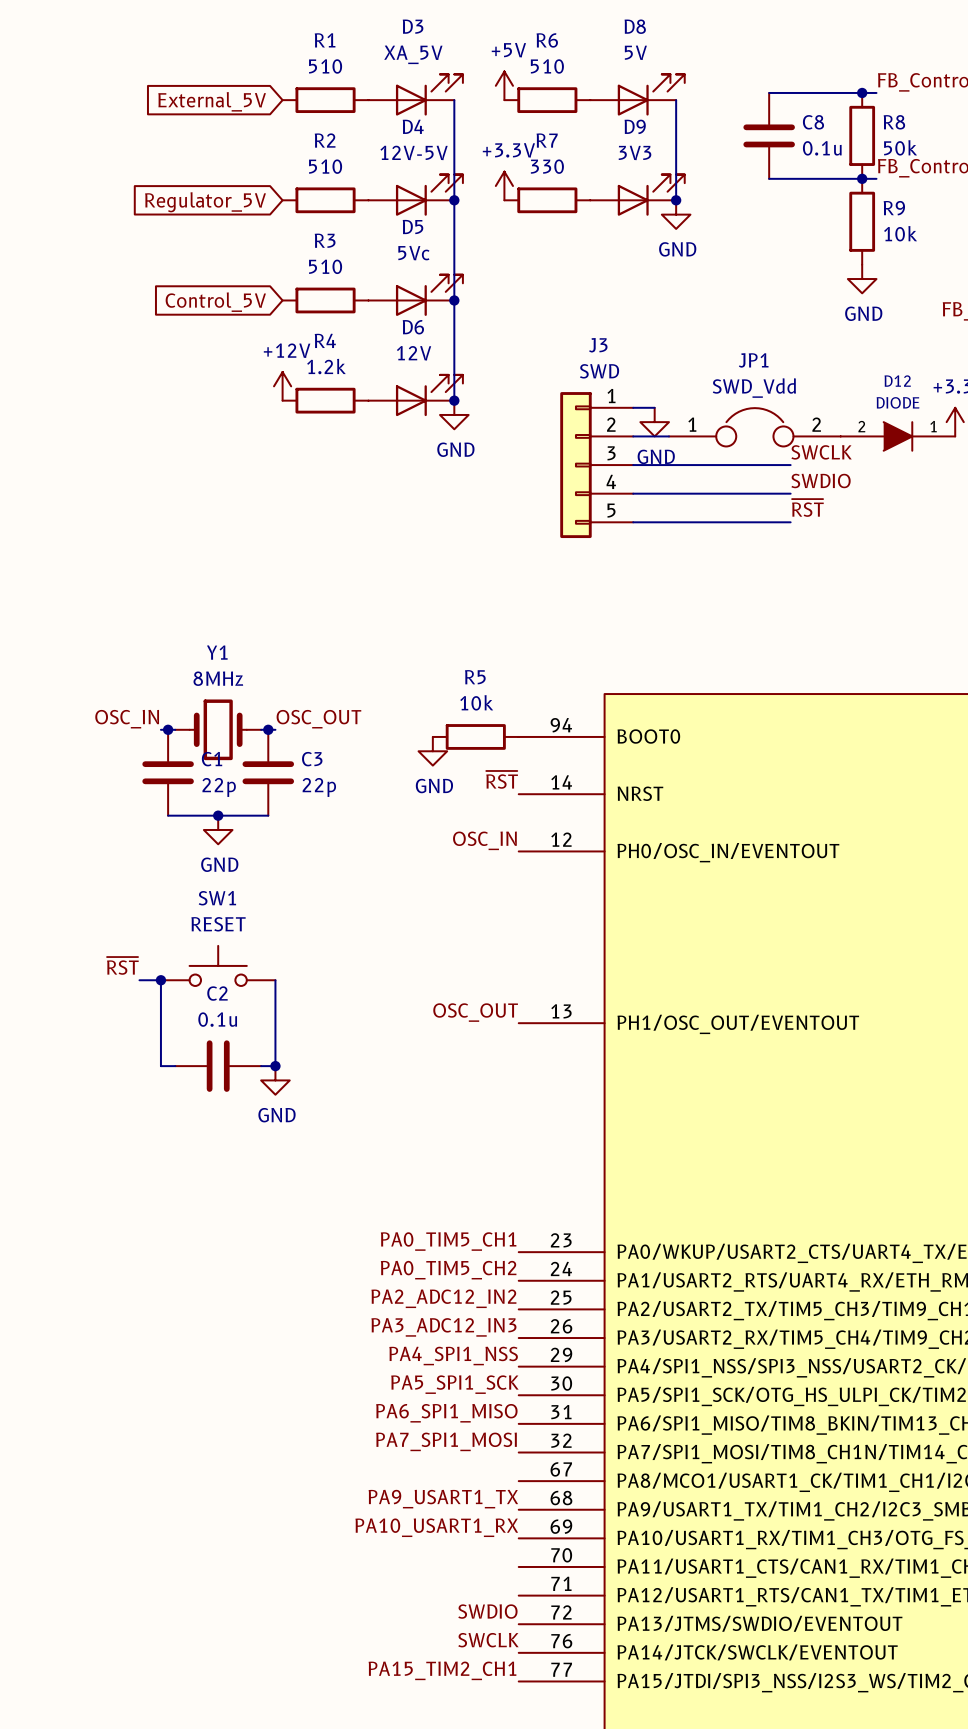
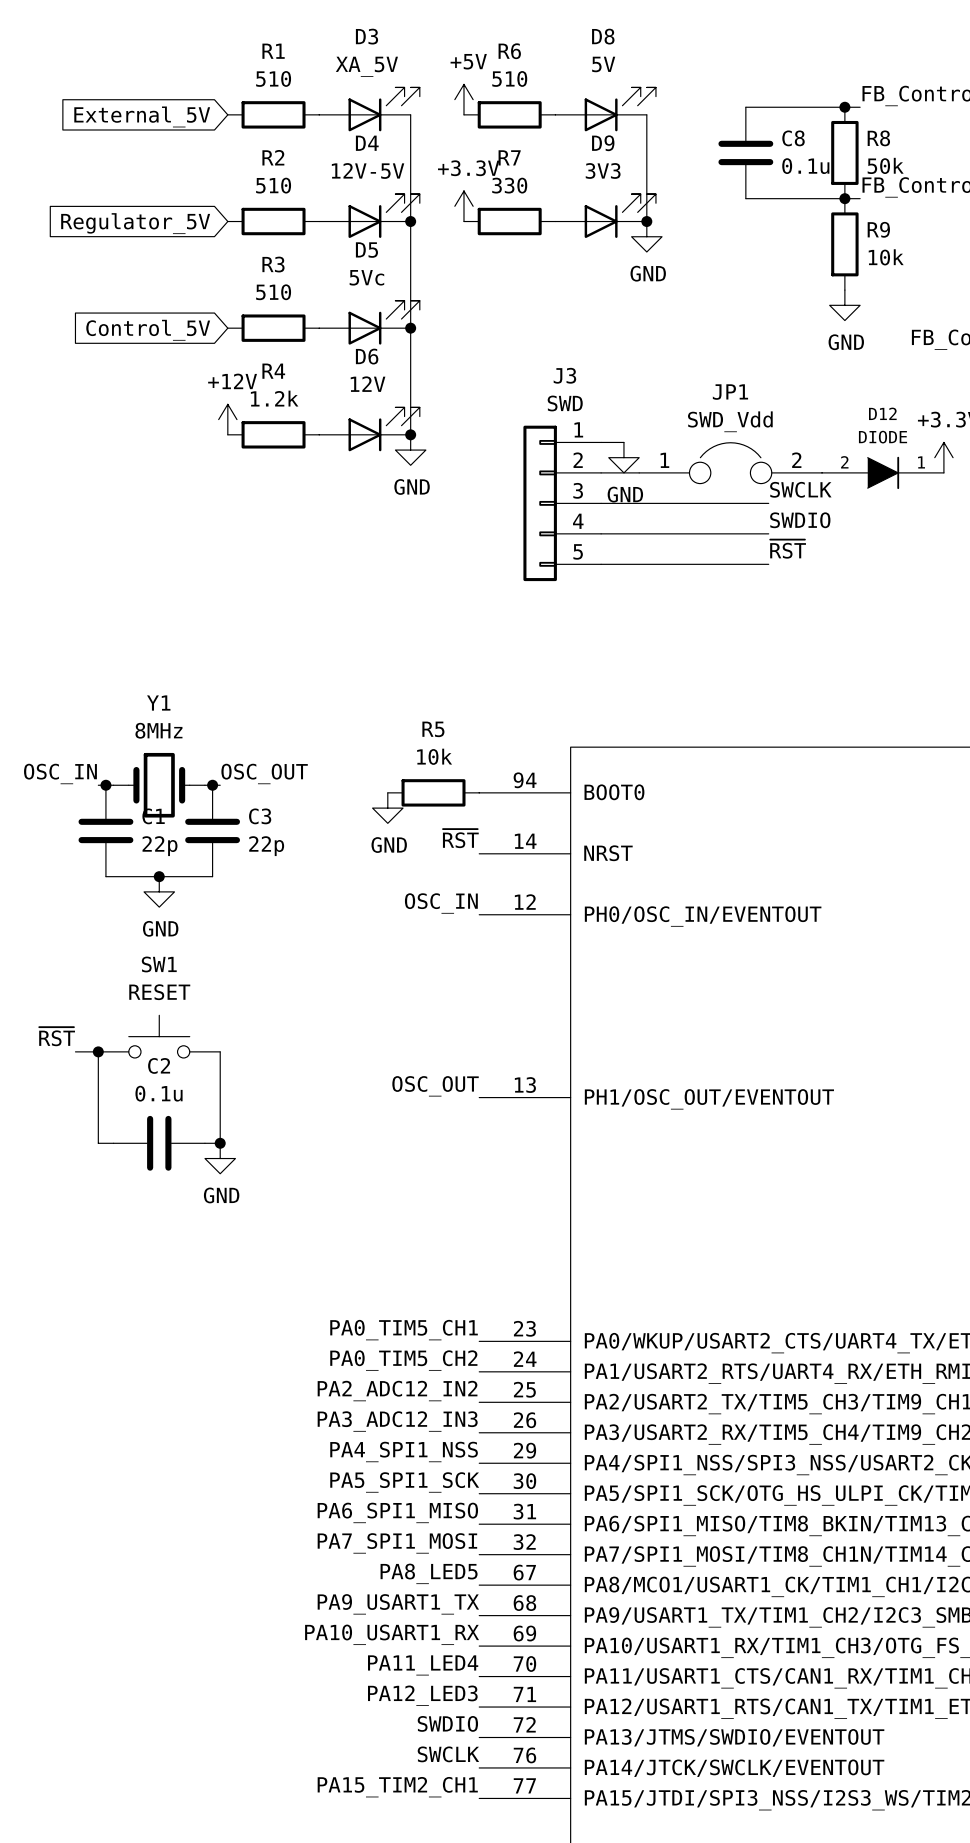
label: none -> PA8_LED5 (429, 1573)
label: none -> PA11_LED4 (423, 1665)
label: none -> PA12_LED3 (422, 1695)

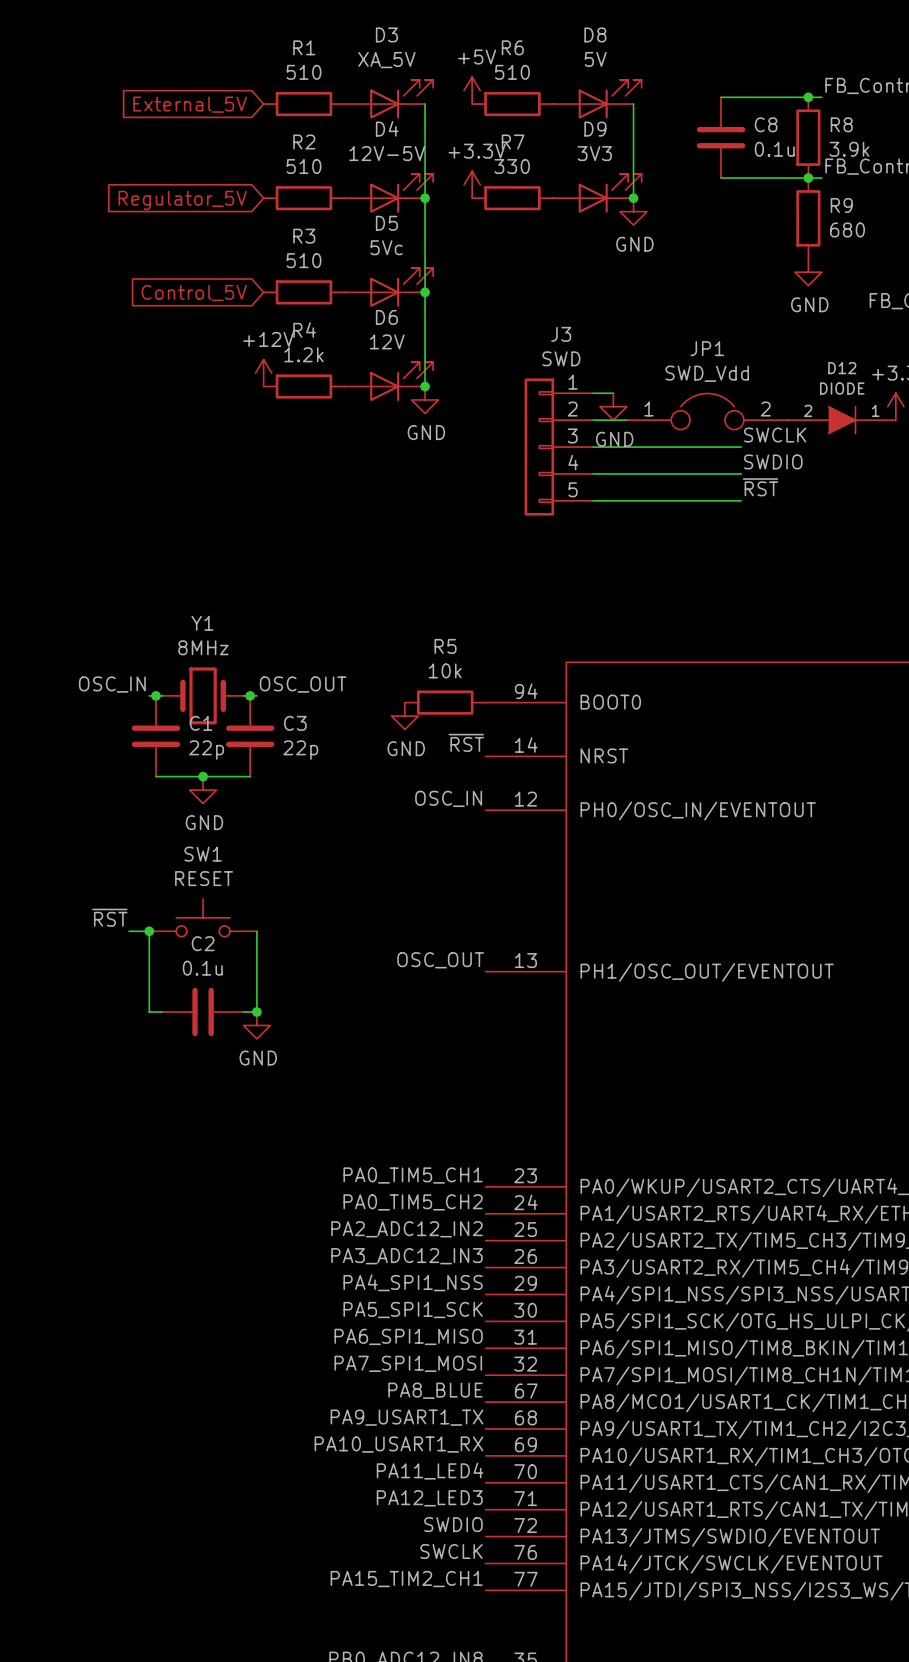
R8 value: 50k (885, 165) -> 3.9k (849, 149)
R9 value: 10k (886, 257) -> 680 (847, 229)
label: PA8_LED5 (429, 1573) -> PA8_BLUE (435, 1390)

